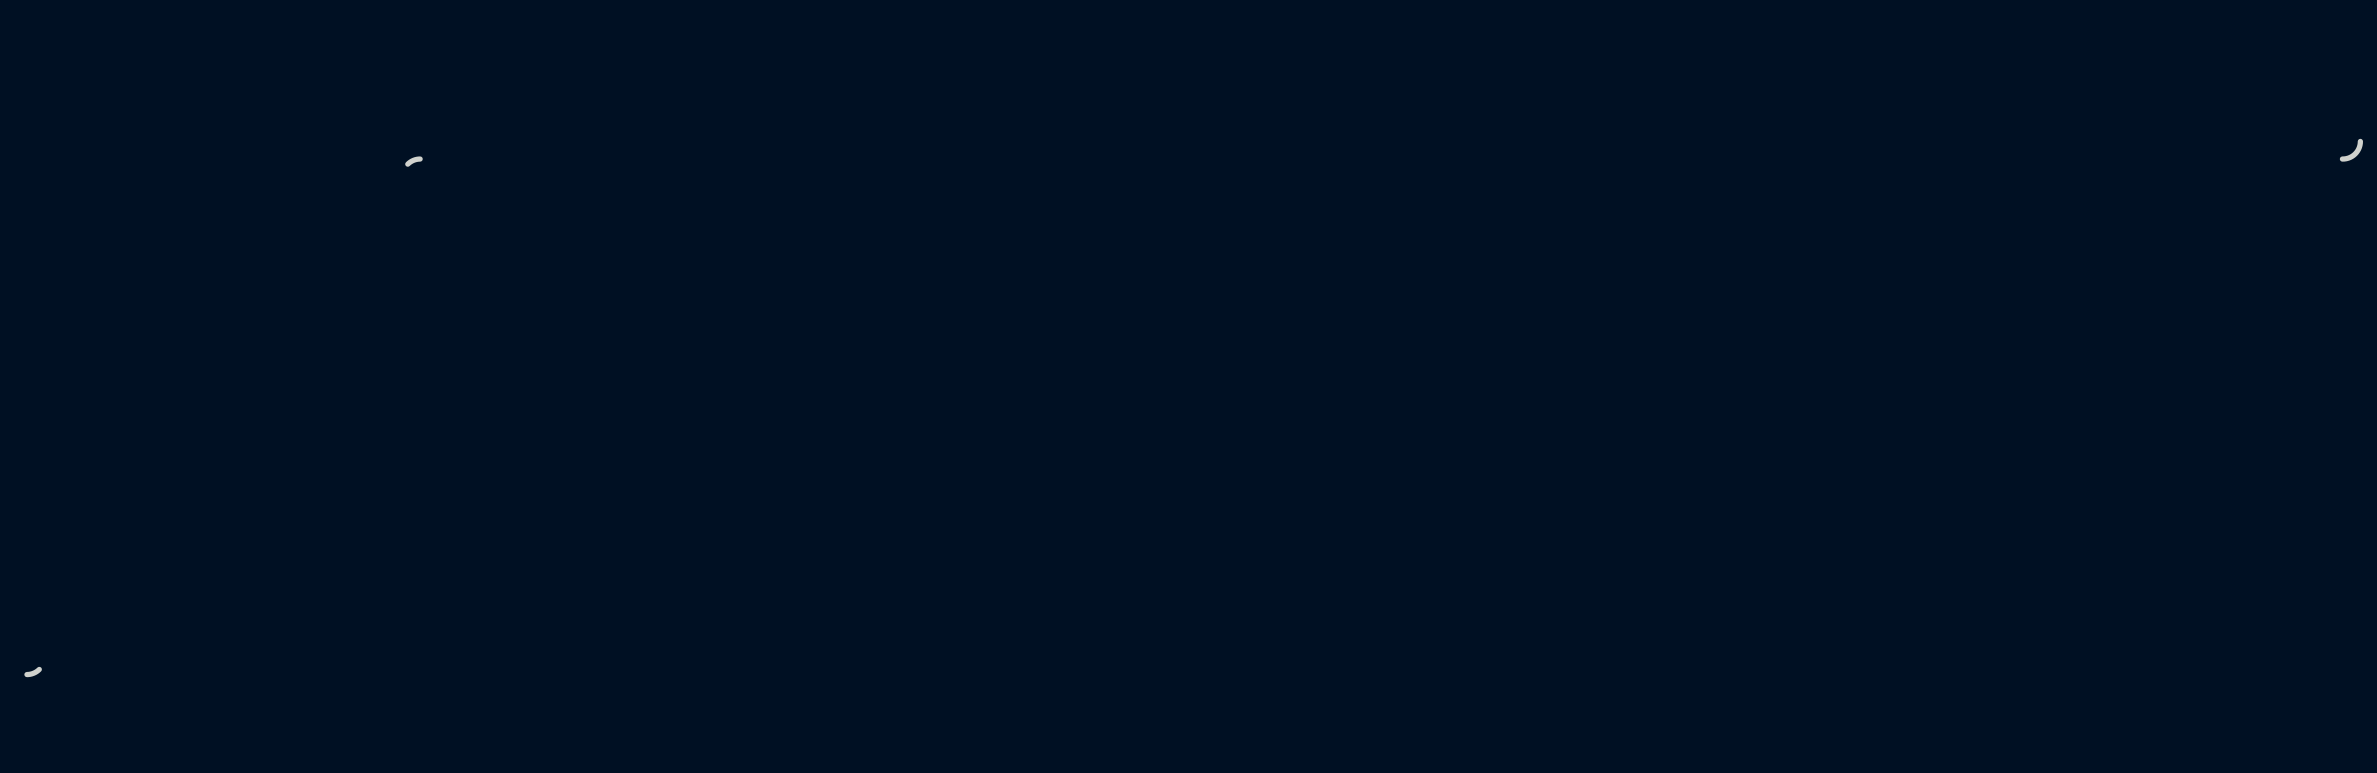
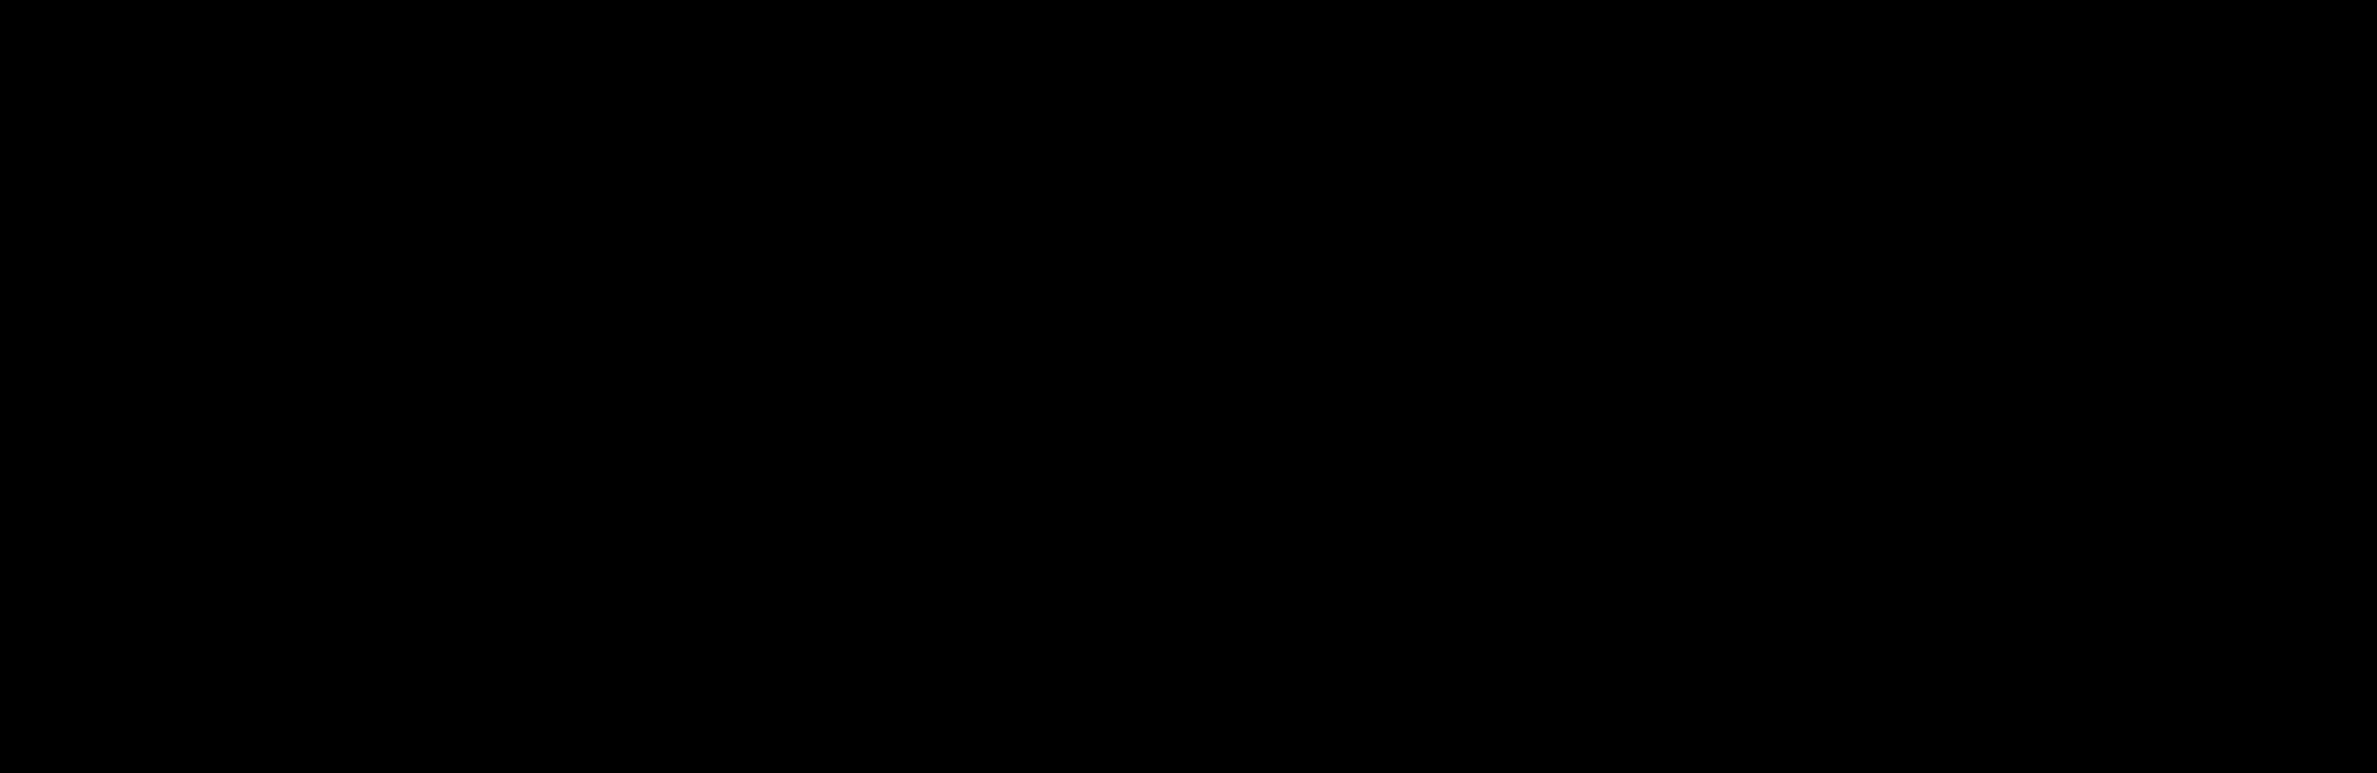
drawing: [24, 138, 2364, 678] -> none

